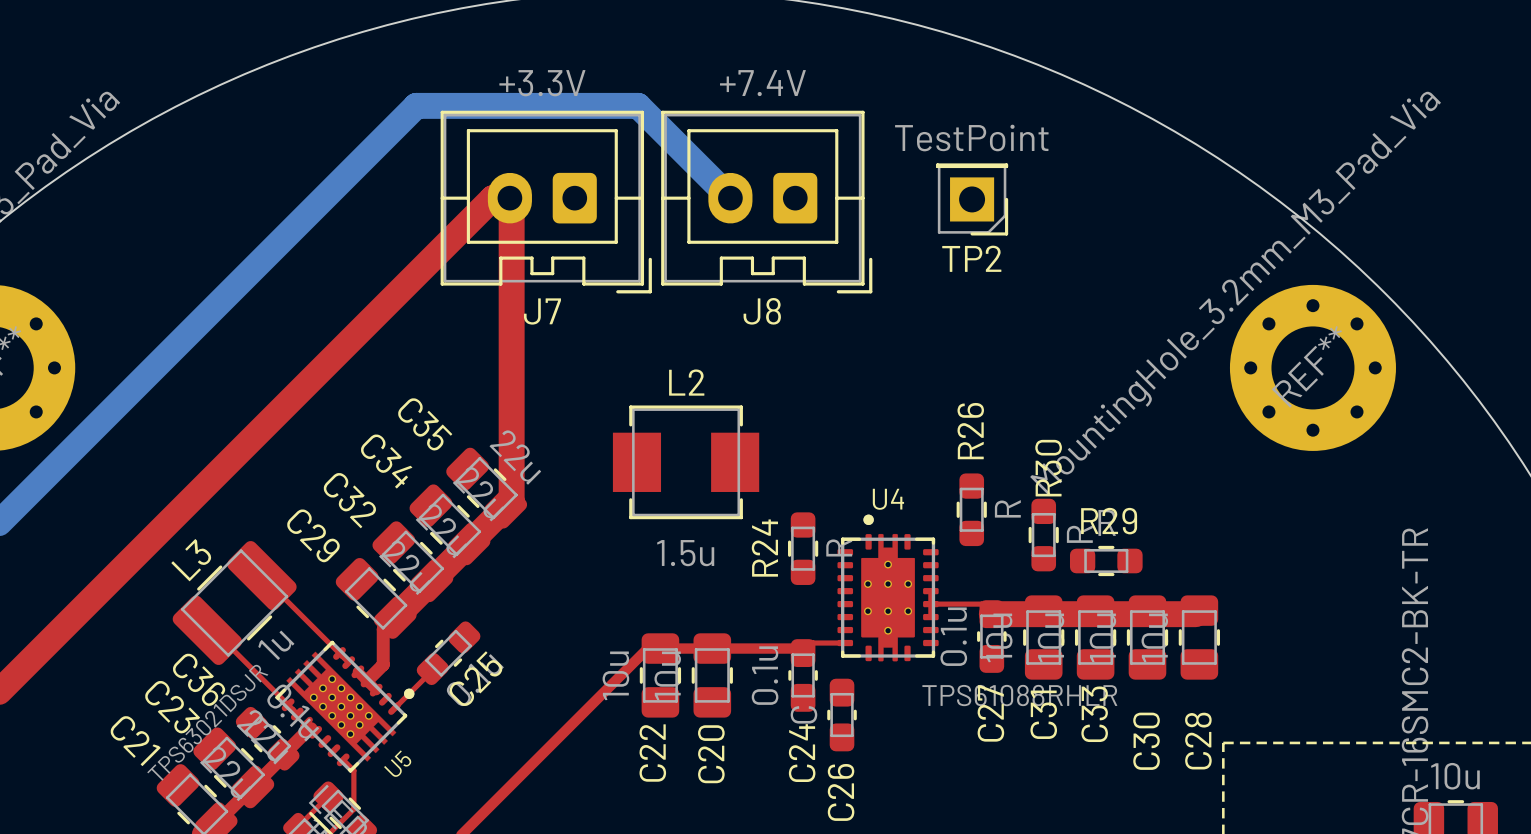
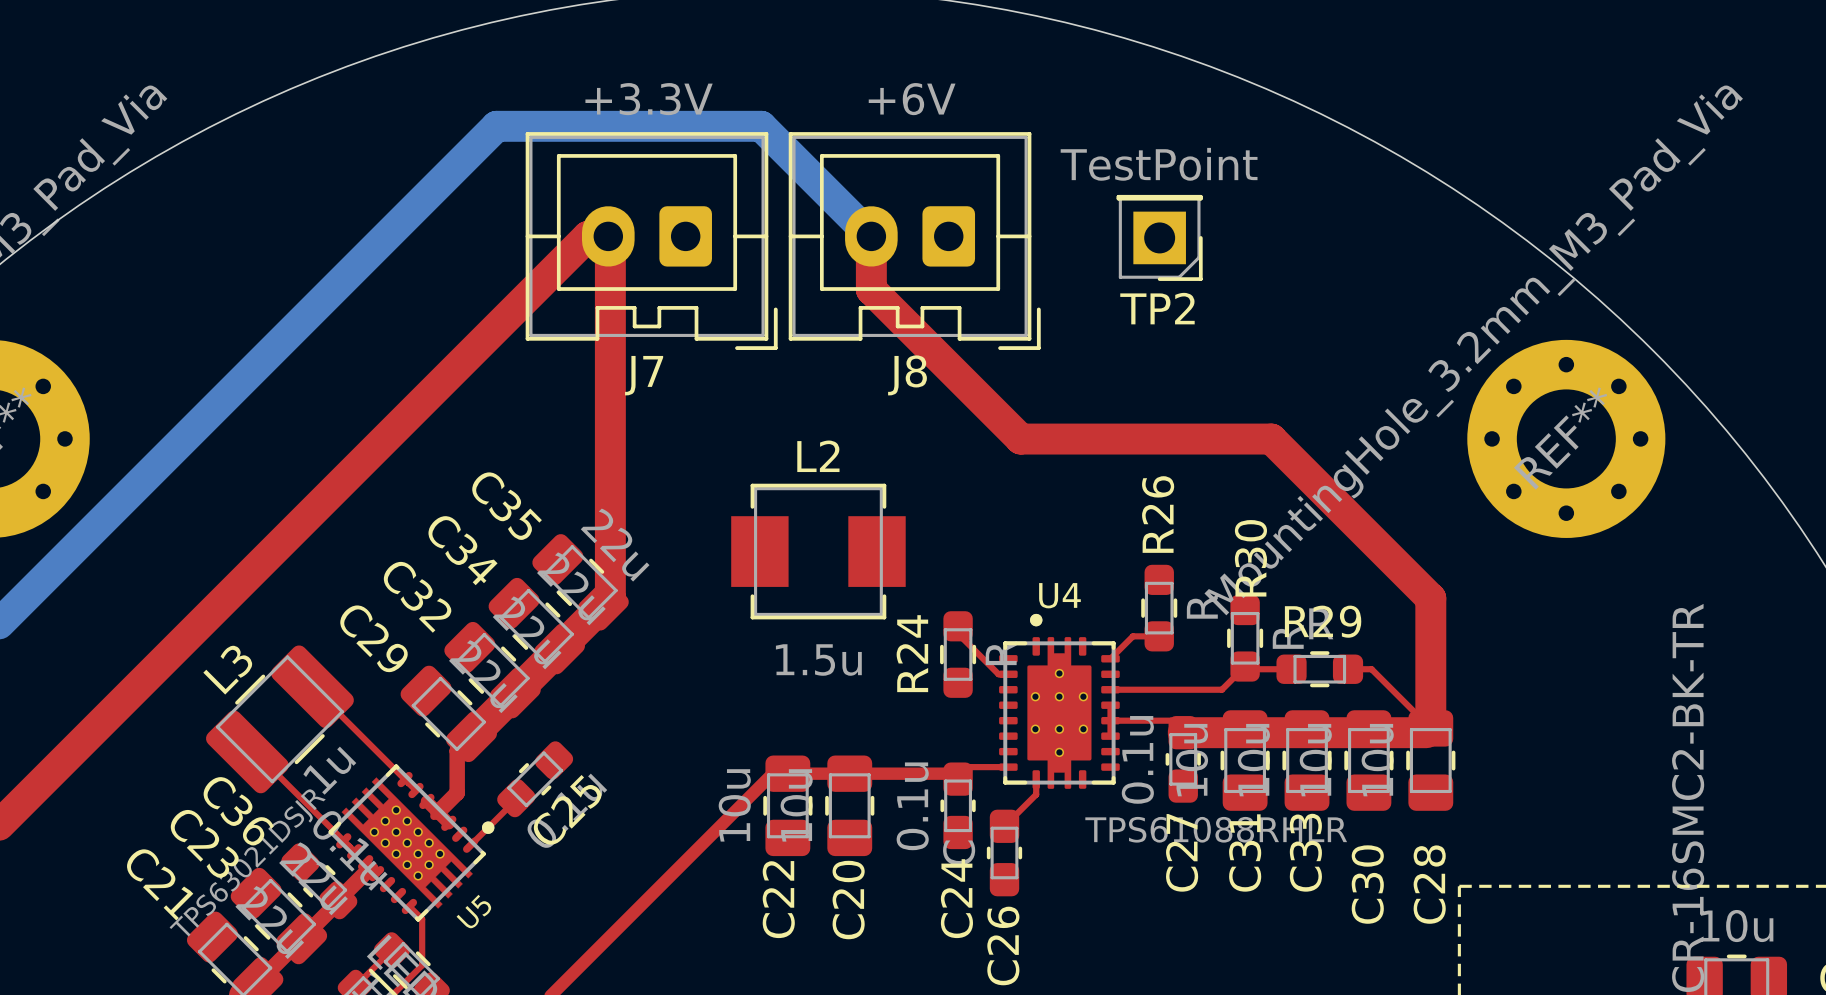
J8 value: +7.4V (762, 83) -> +6V (912, 99)
top track: none -> (871, 236) (871, 289) (1020, 439) (1271, 439) (1430, 598) (1430, 728) (1371, 669) (1348, 669)
top track: none -> (958, 626) (958, 633) (998, 674) (1008, 674)
top track: none -> (1159, 636) (1132, 636) (1110, 658)
top track: none -> (1291, 669) (1247, 669) (1245, 666) (1221, 689) (1110, 689)
top track: none -> (1036, 779) (1036, 794) (1004, 826)

